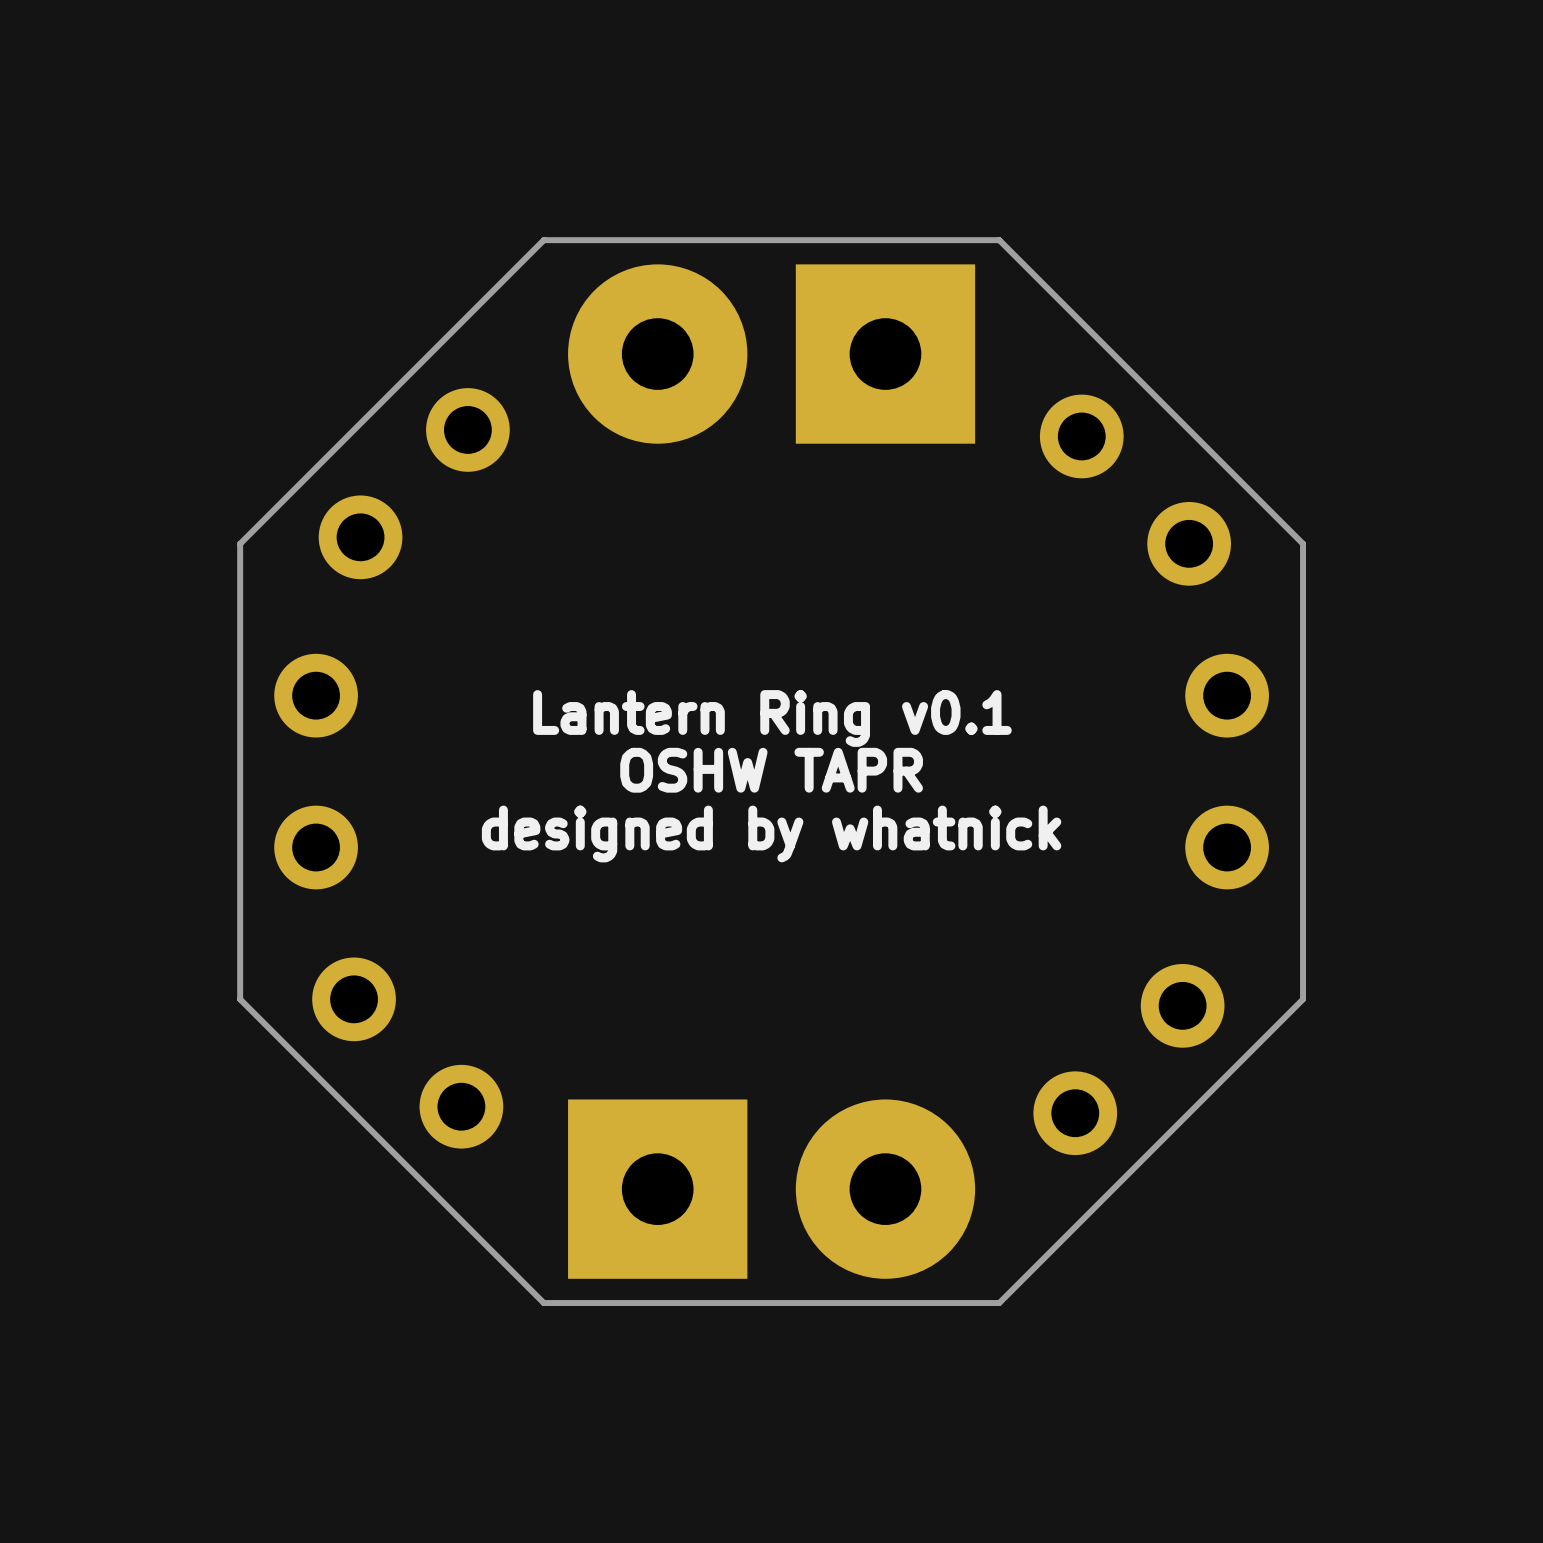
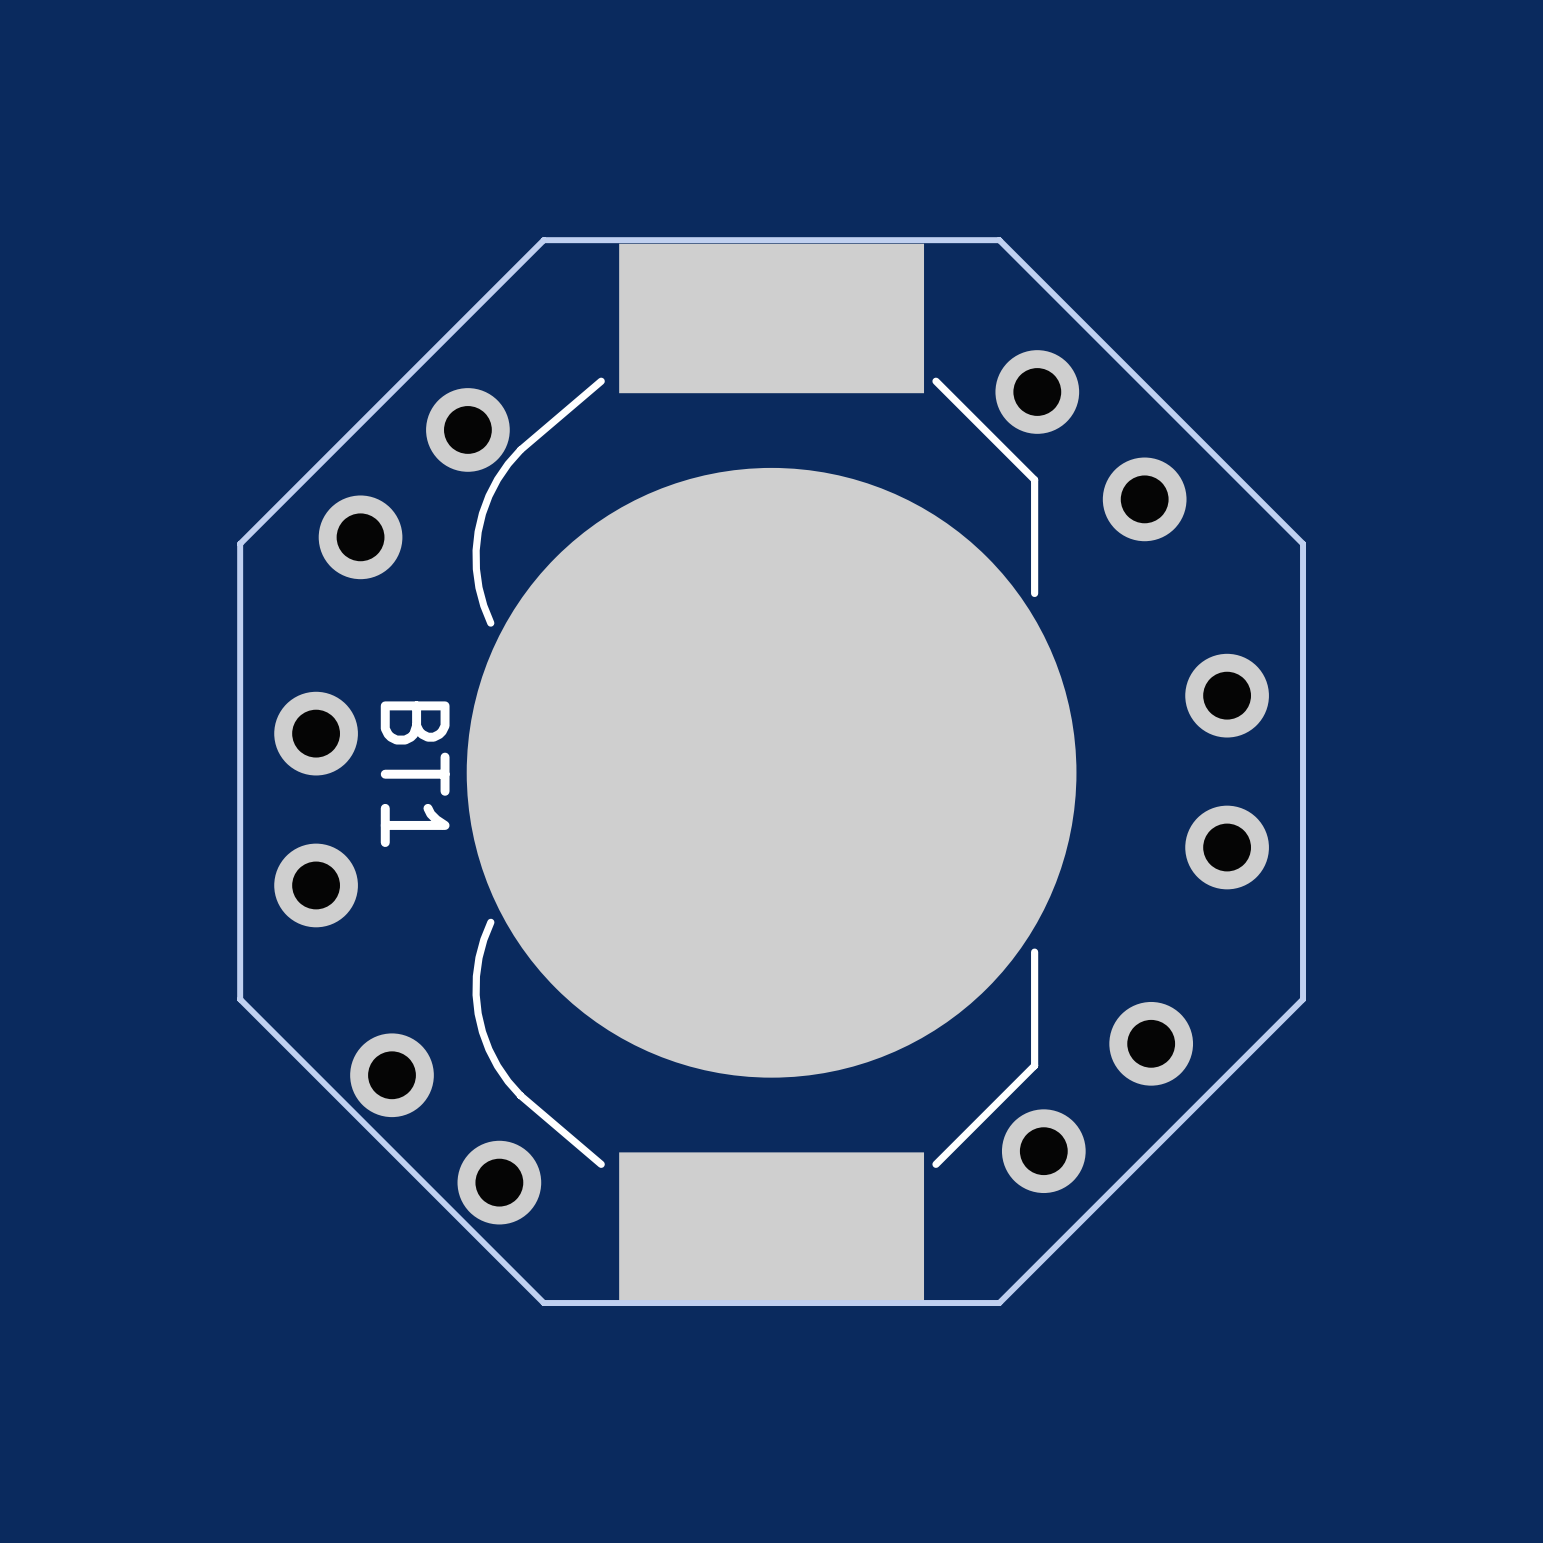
part: (771, 354) -> none
part position: (1135, 490) -> (1090, 445)
text: Lantern Ring v0.1 (772, 718) -> none
text: OSHW TAPR (771, 770) -> none
part position: (316, 771) -> (316, 809)
BT1: none -> (771, 772)
text: designed by whatnick (771, 833) -> none
part position: (407, 1053) -> (445, 1128)
part position: (1128, 1059) -> (1097, 1097)
part: (771, 1189) -> none

